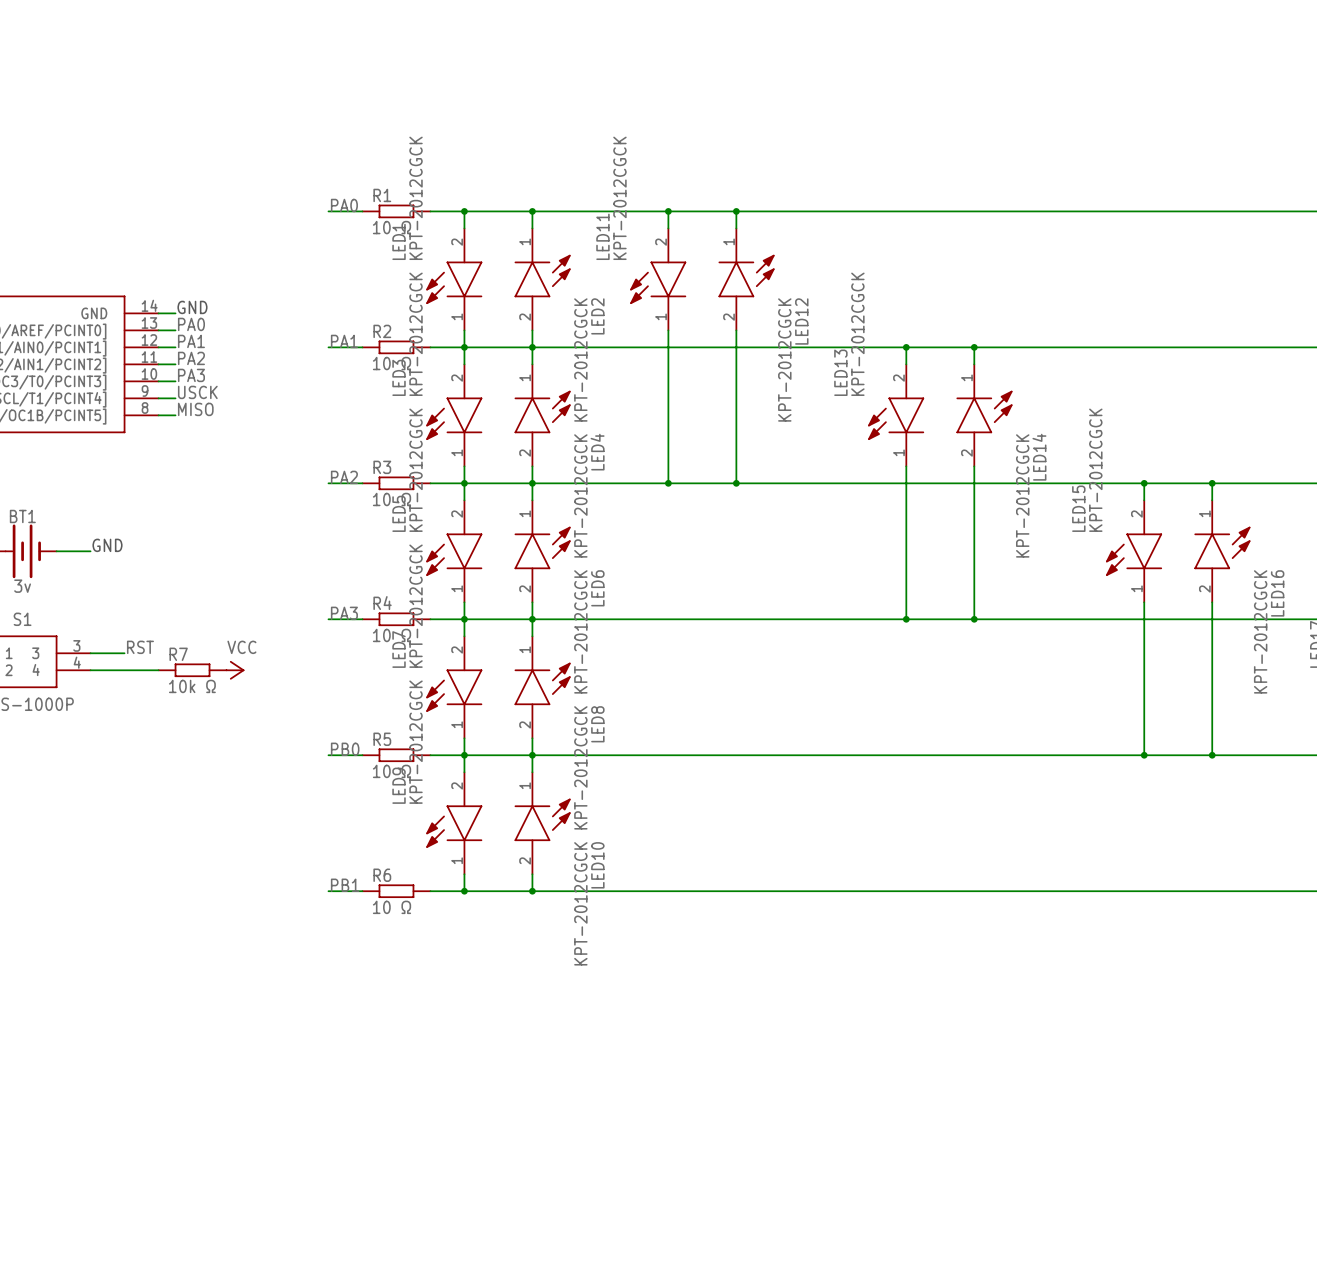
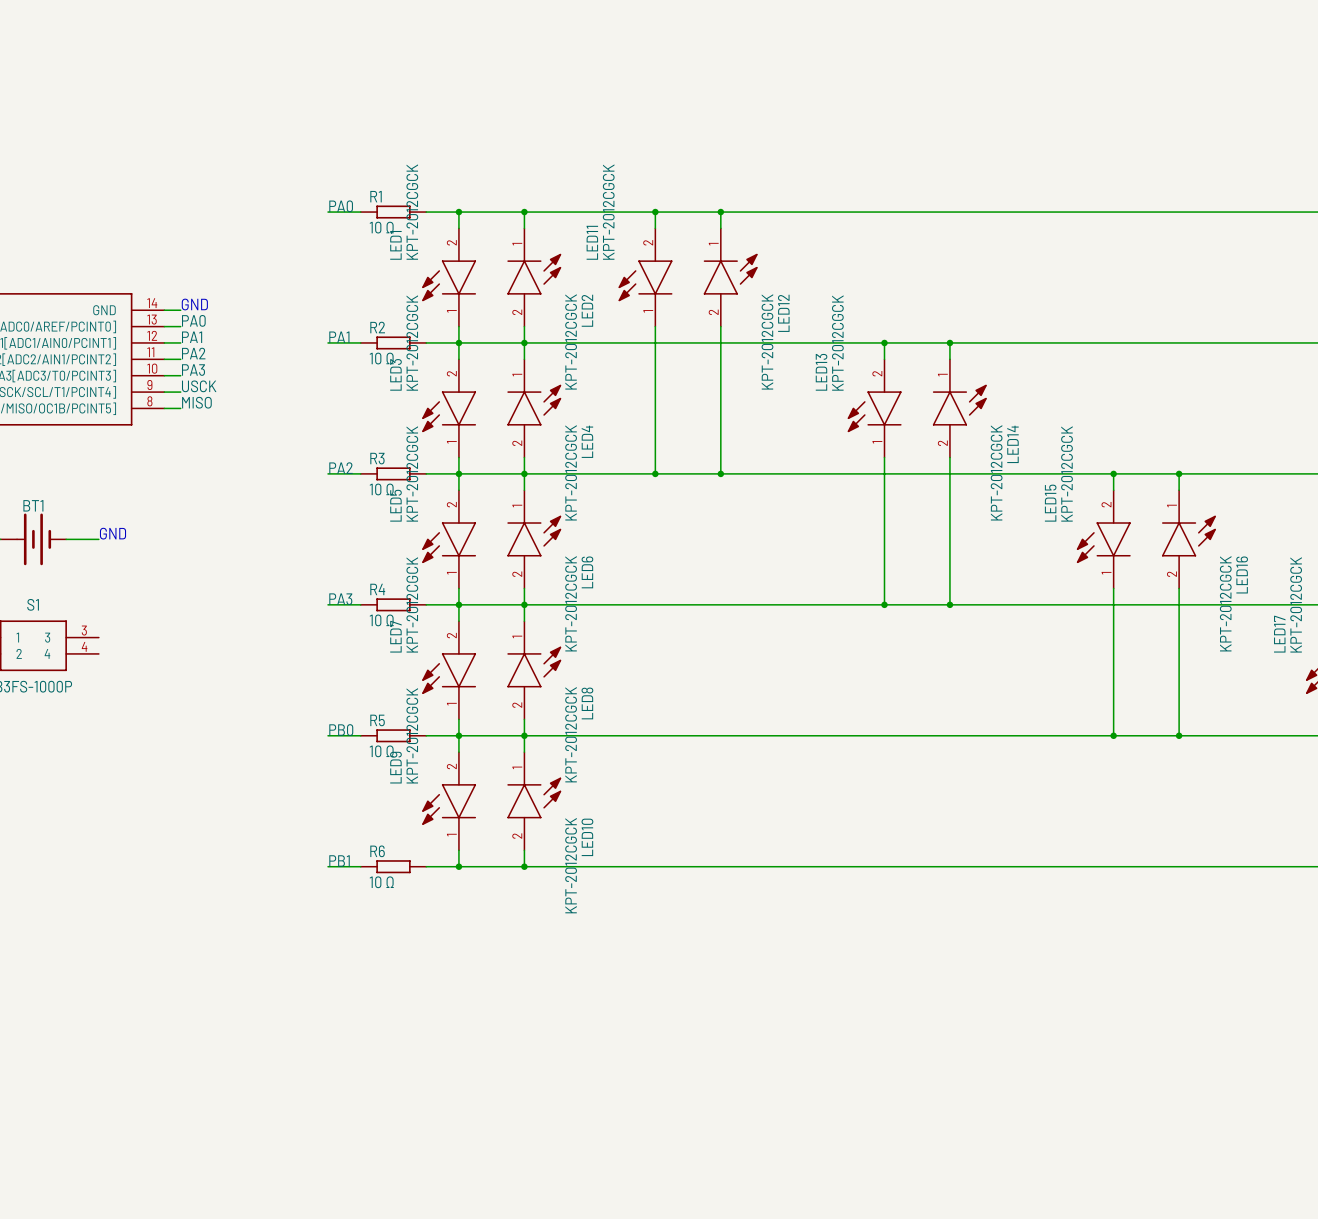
BT1 value: 3v (22, 586) -> none
text: RST (140, 647) -> none
wire: (90, 653) (124, 653) -> none
wire: (90, 670) (158, 670) -> none
R7: 10k Ω (192, 670) -> none
power symbol: VCC (235, 670) -> none

